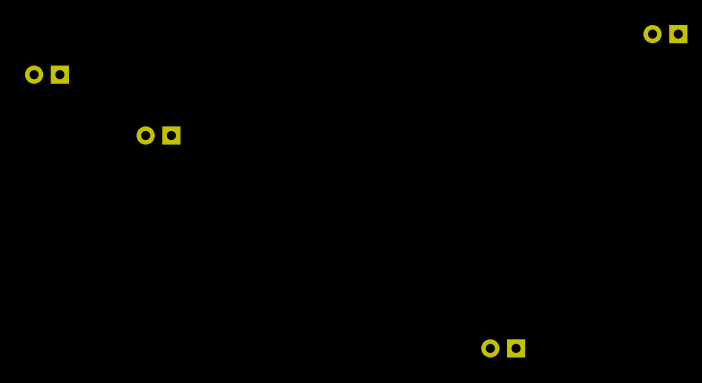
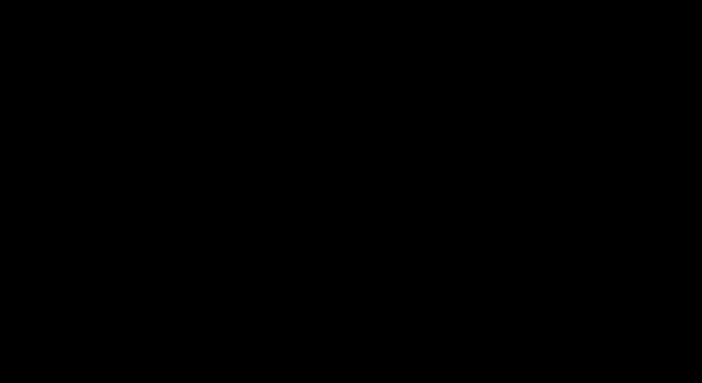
part: (665, 34) -> none
part: (46, 74) -> none
part: (158, 135) -> none
part: (503, 348) -> none

